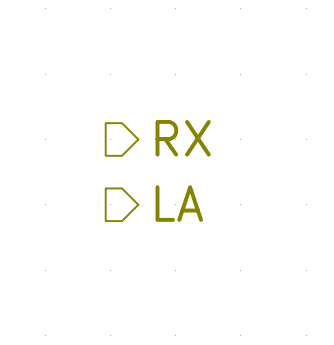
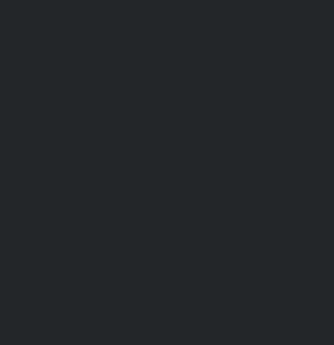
hierarchical label: RX (183, 138) -> none
hierarchical label: LA (179, 203) -> none

